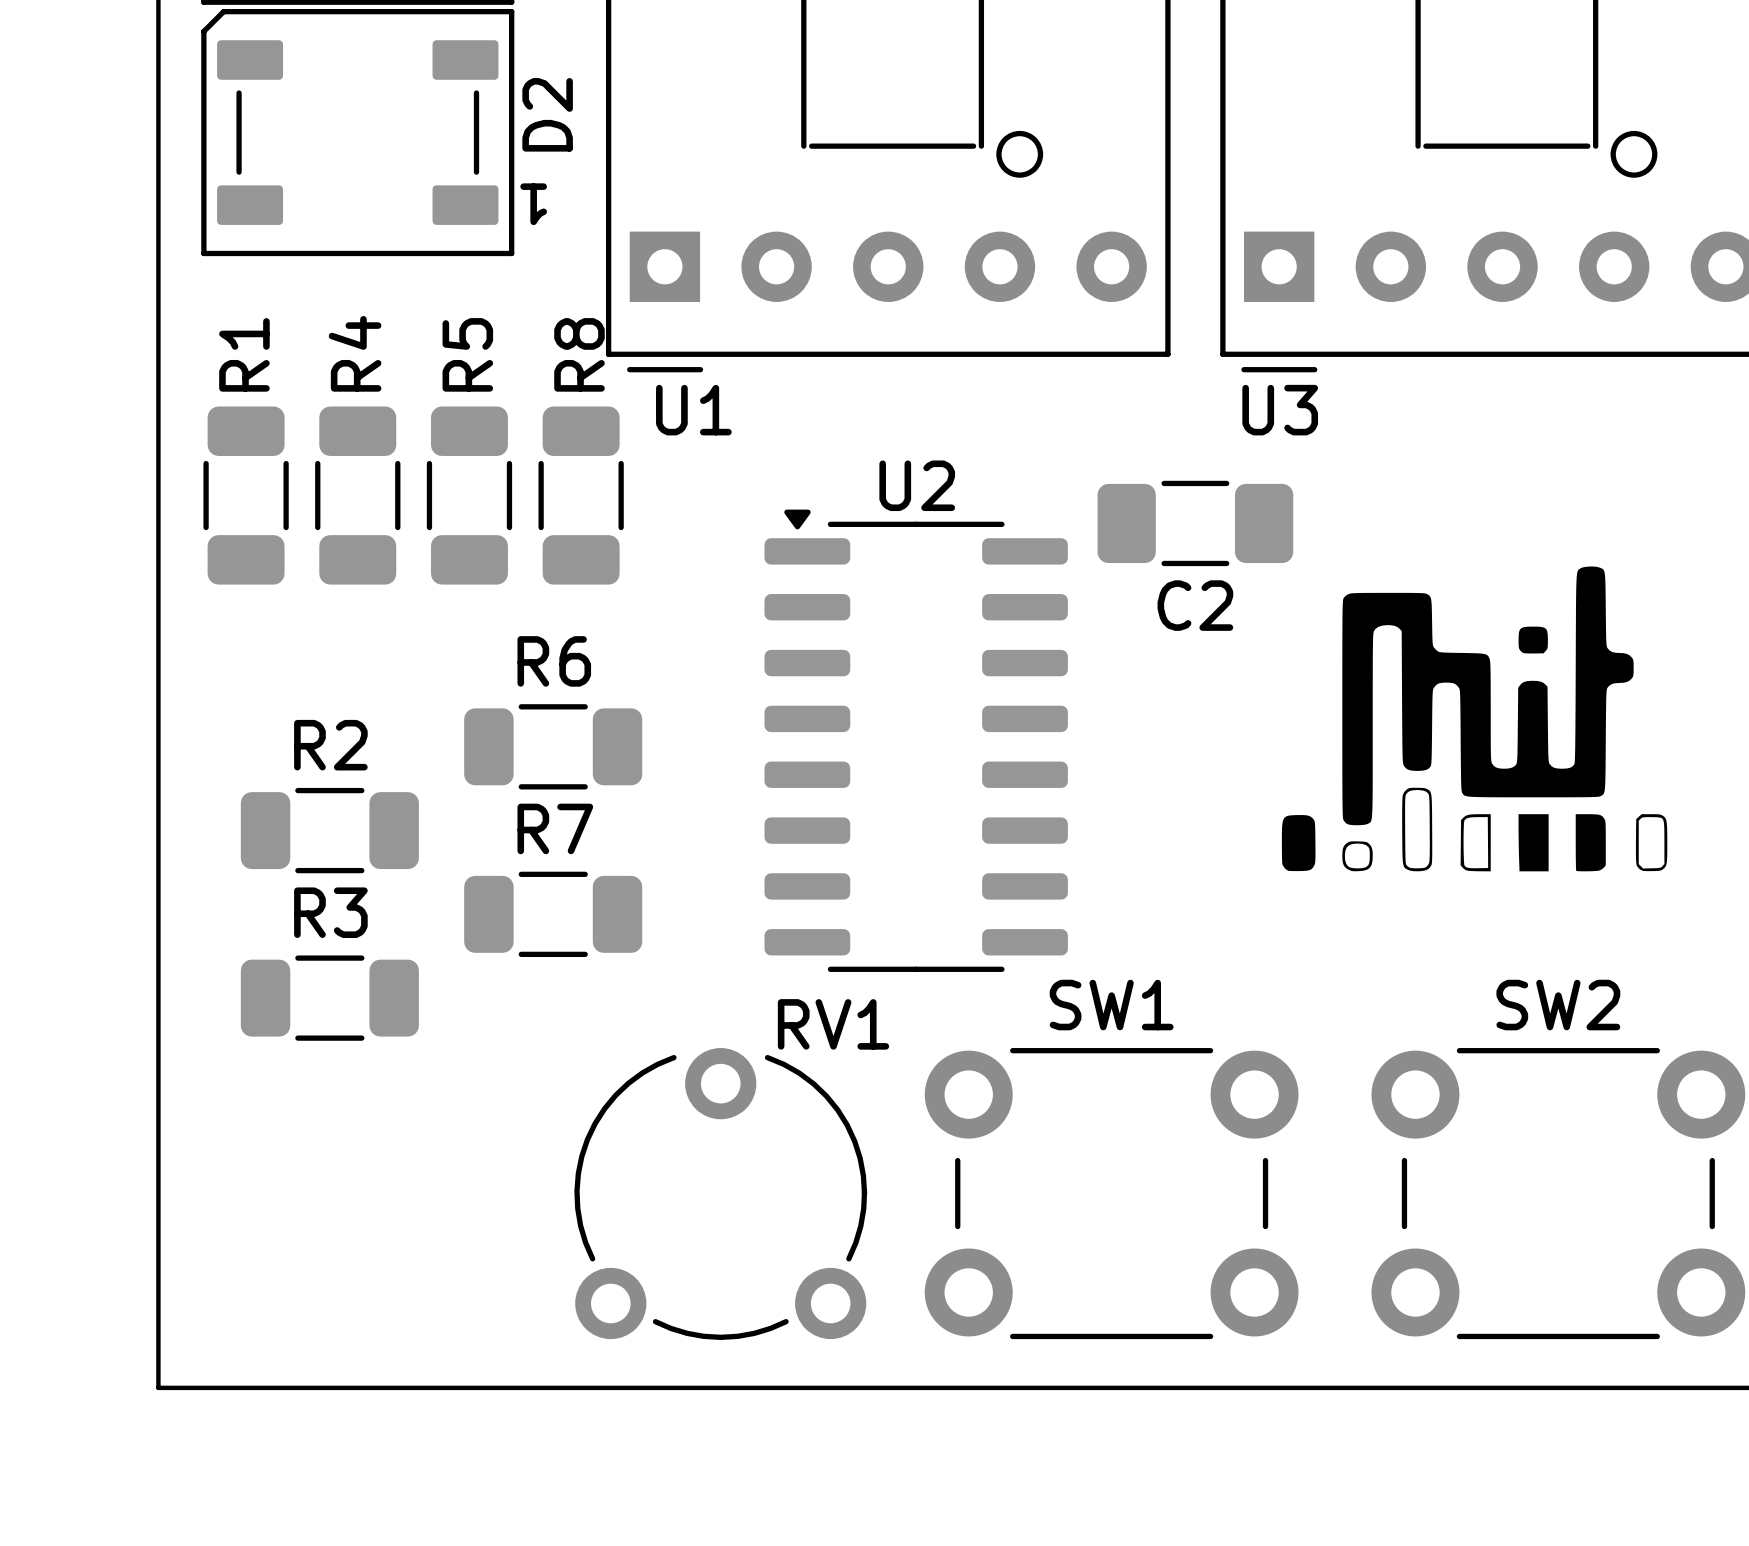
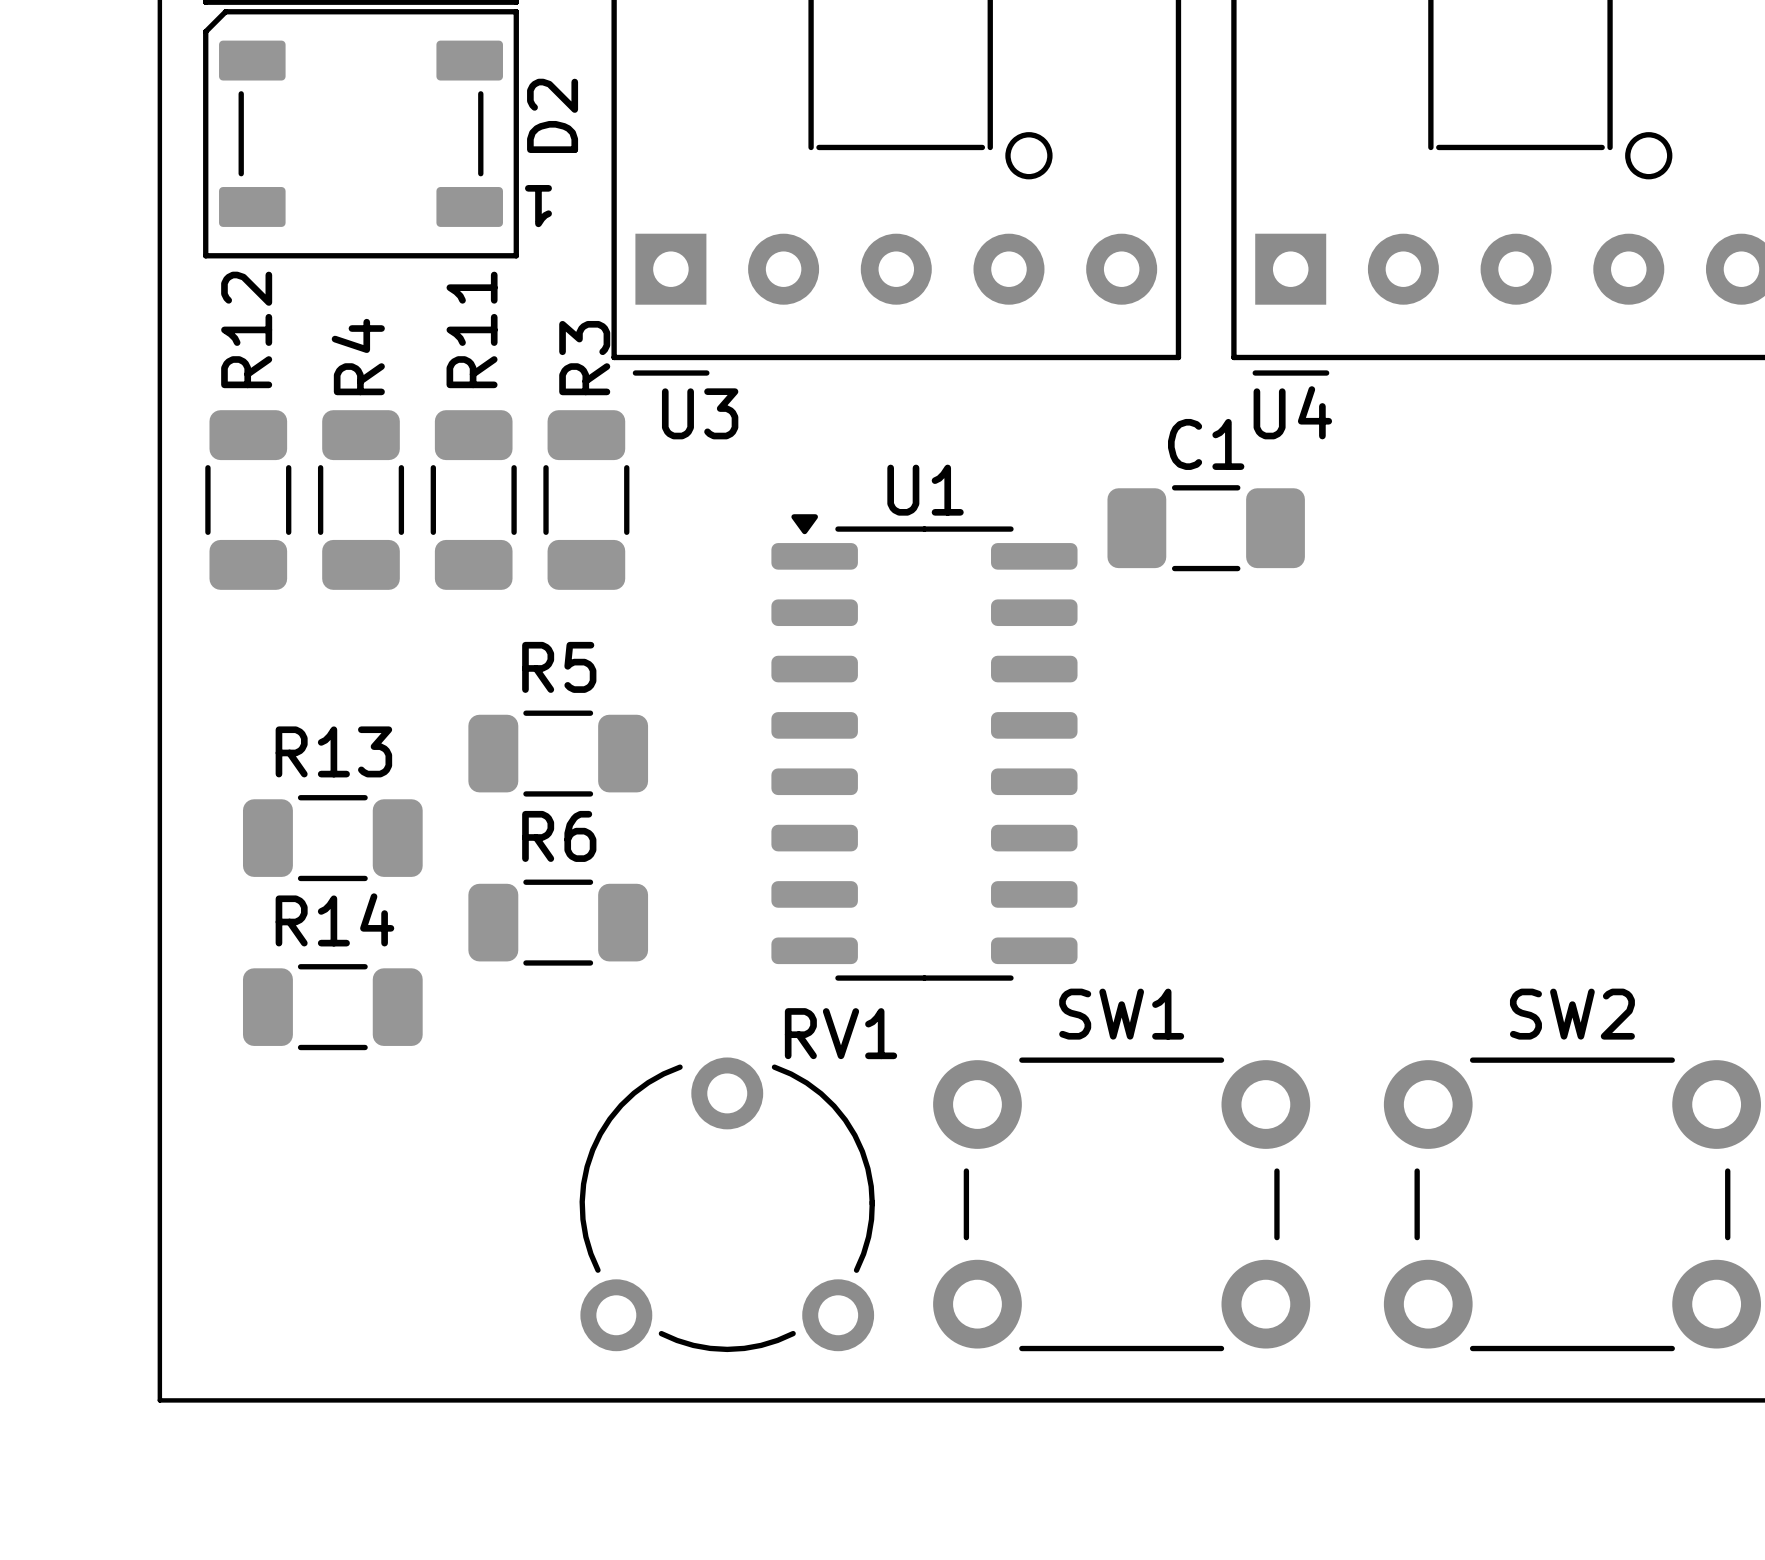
R1 name: R1 (244, 354) -> R12 (246, 329)
R5 name: R5 (467, 354) -> R11 (472, 329)
R8 name: R8 (579, 354) -> R3 (584, 358)
U1 name: U1 (693, 410) -> U3 (700, 413)
U3 name: U3 (1280, 410) -> U4 (1292, 412)
U2 name: U2 (917, 485) -> U1 (925, 490)
drawing: [1281, 566, 1668, 872] -> none
C2 name: C2 (1195, 605) -> C1 (1206, 444)
R6 name: R6 (554, 661) -> R5 (559, 667)
R2 name: R2 (330, 745) -> R13 (333, 751)
R7 name: R7 (555, 828) -> R6 (559, 836)
R3 name: R3 (330, 912) -> R14 (334, 919)

